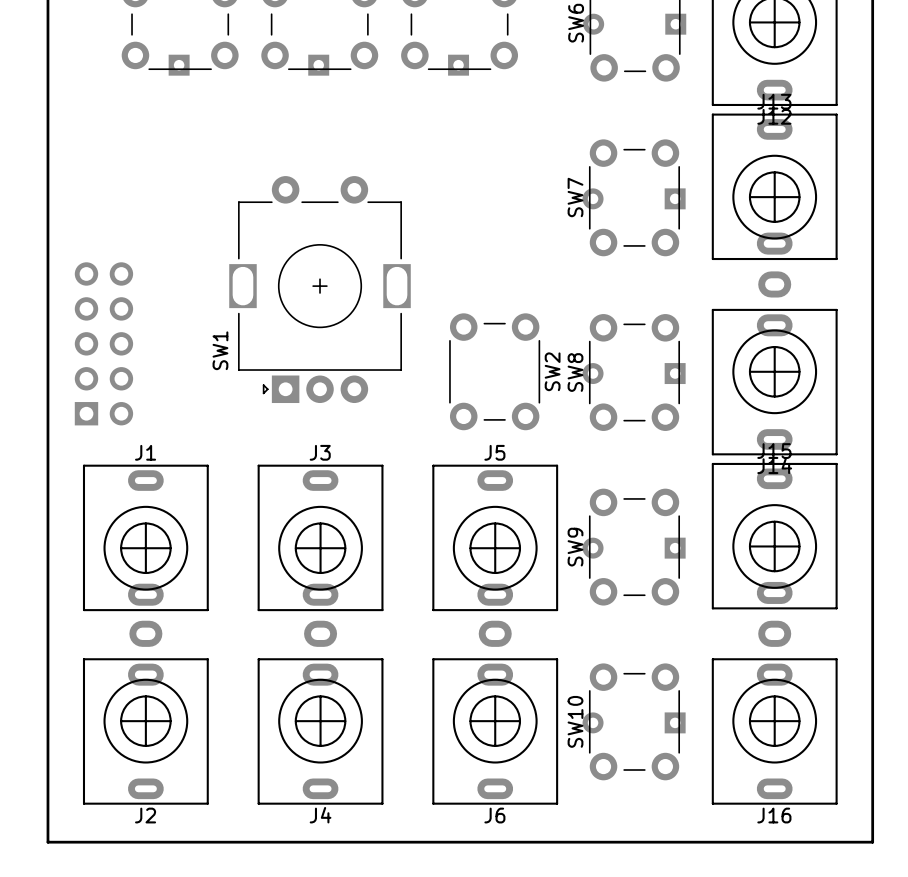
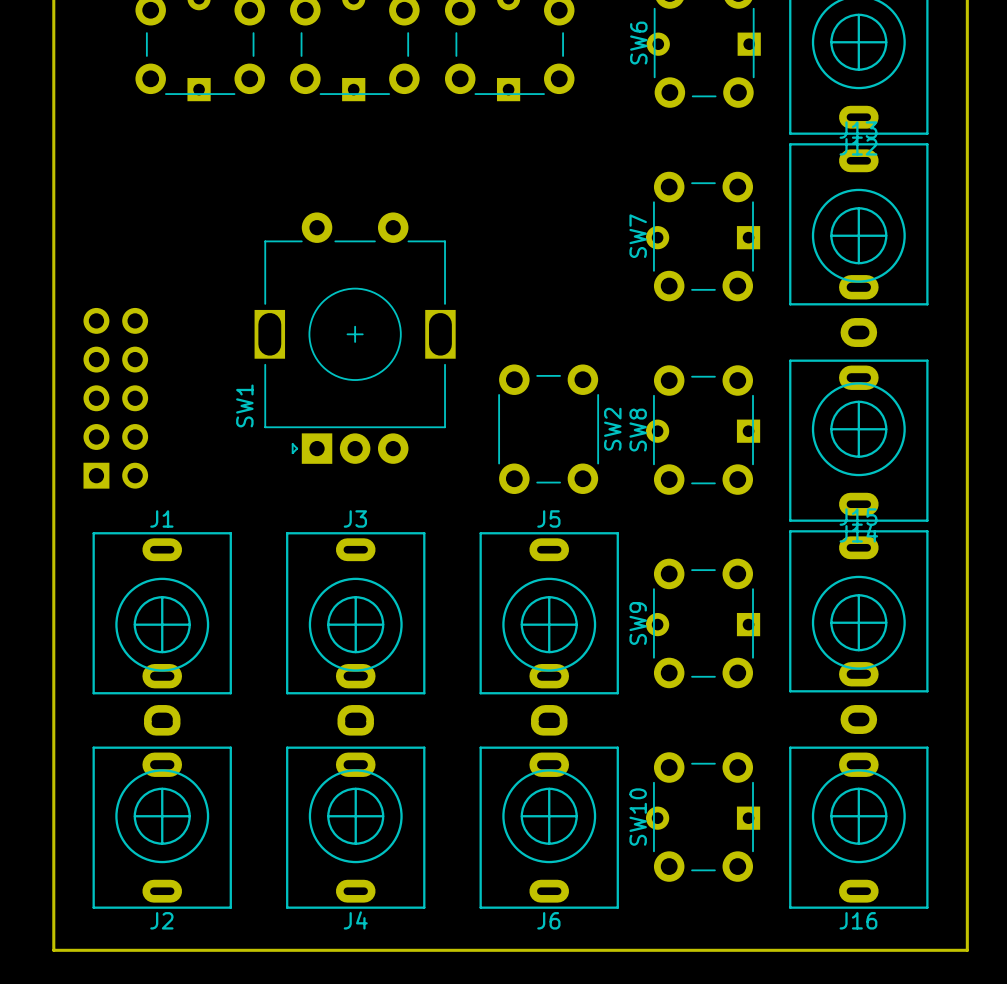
J1 footprint: [82, 464, 209, 612] -> [92, 532, 232, 736]
J3 footprint: [257, 464, 384, 612] -> [286, 532, 426, 736]
J5 footprint: [432, 464, 559, 612] -> [479, 532, 619, 736]

